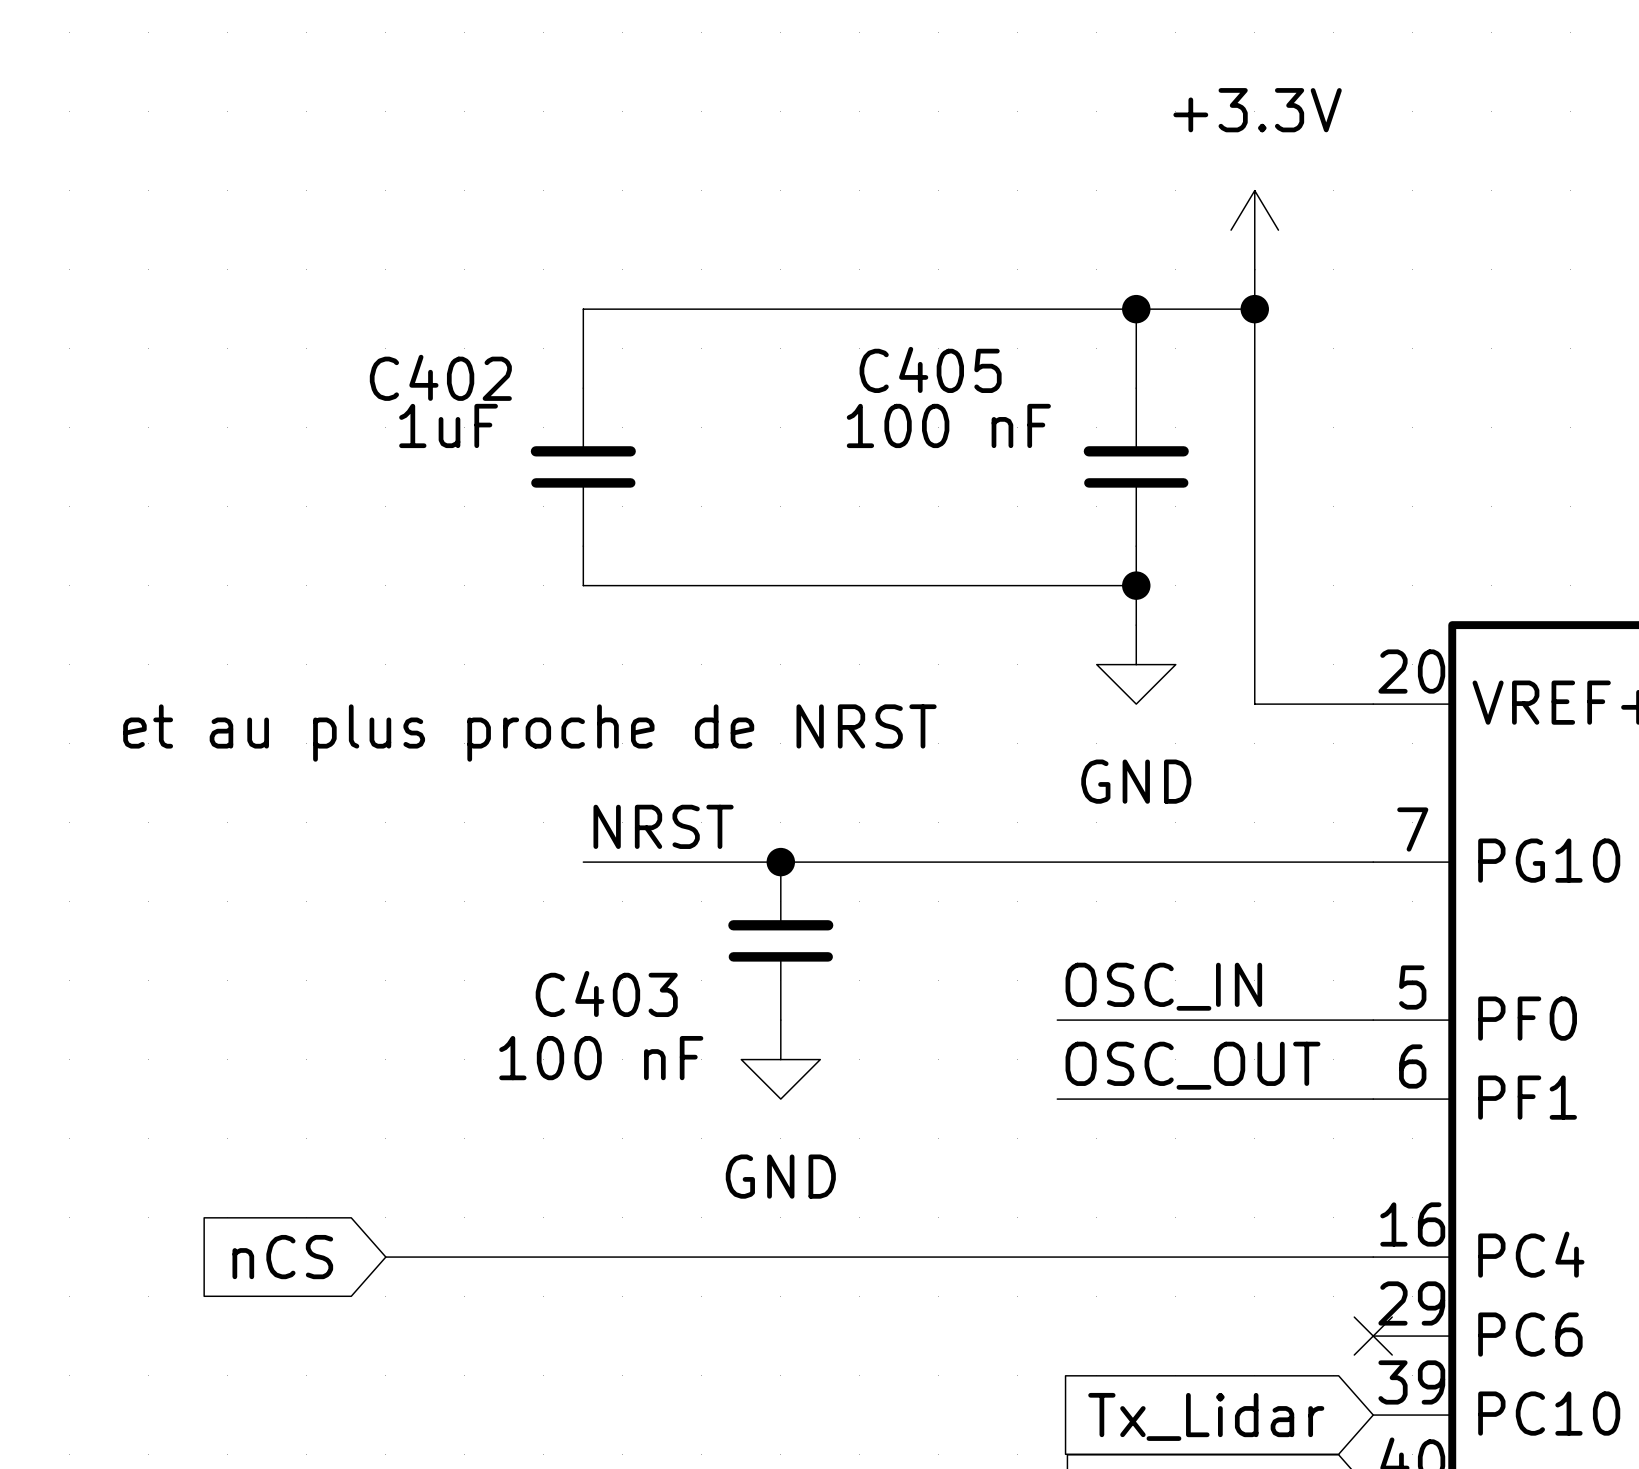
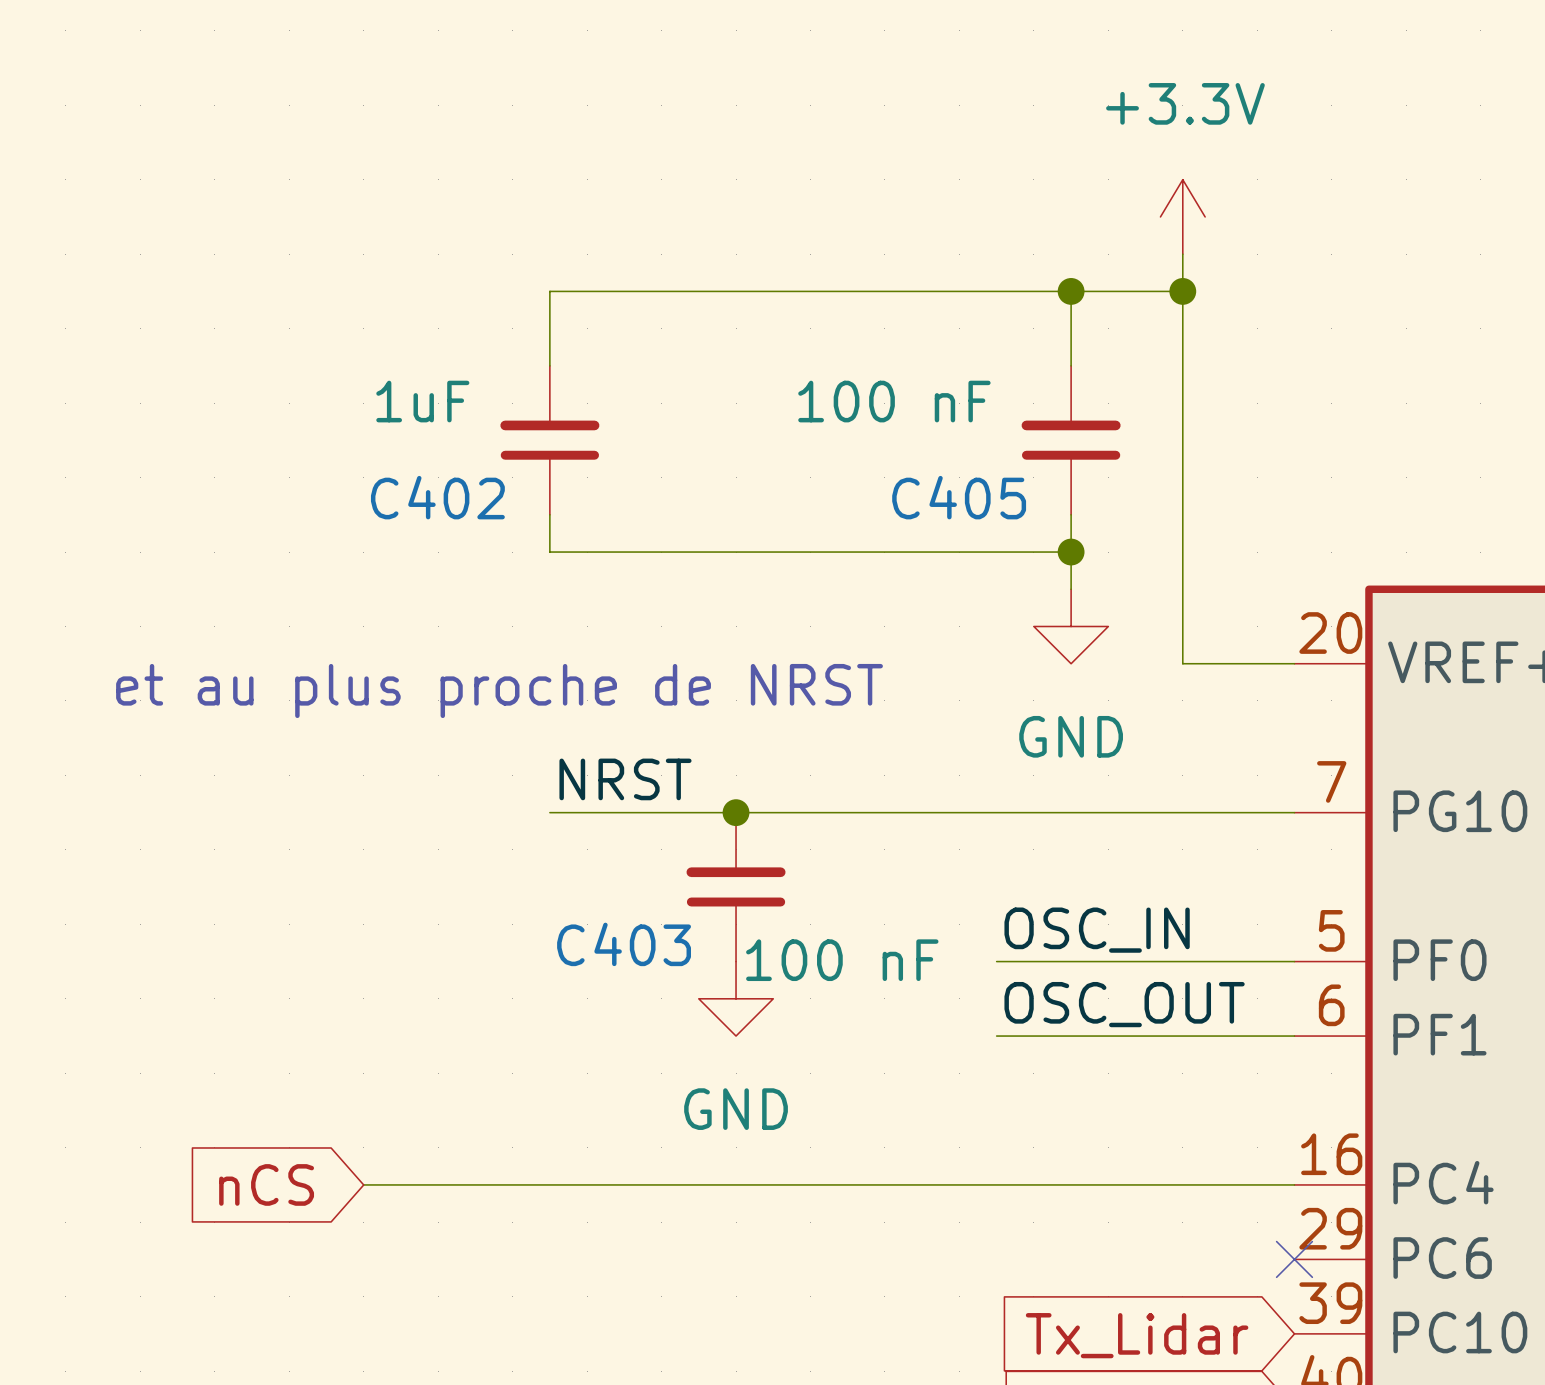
C405 name position: C405 (930, 369) -> C405 (959, 497)
C402 name position: C402 (440, 377) -> C402 (437, 497)
C403 name position: C403 (606, 993) -> C403 (624, 944)
C403 value position: 100 nF (601, 1058) -> 100 nF (842, 960)

